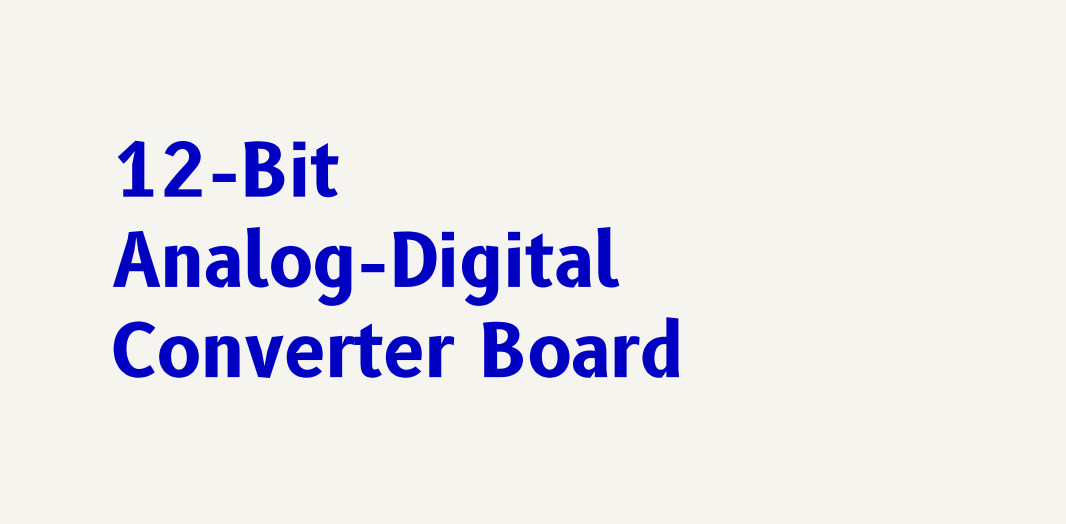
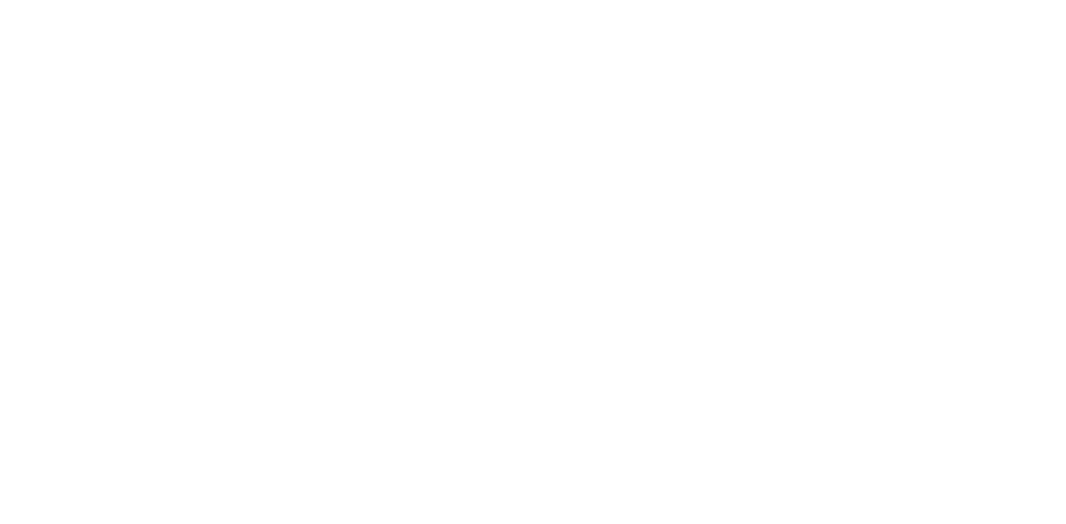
text: 12-Bit (228, 168) -> none
text: Analog-Digital (366, 266) -> none
text: Converter Board (396, 347) -> none

